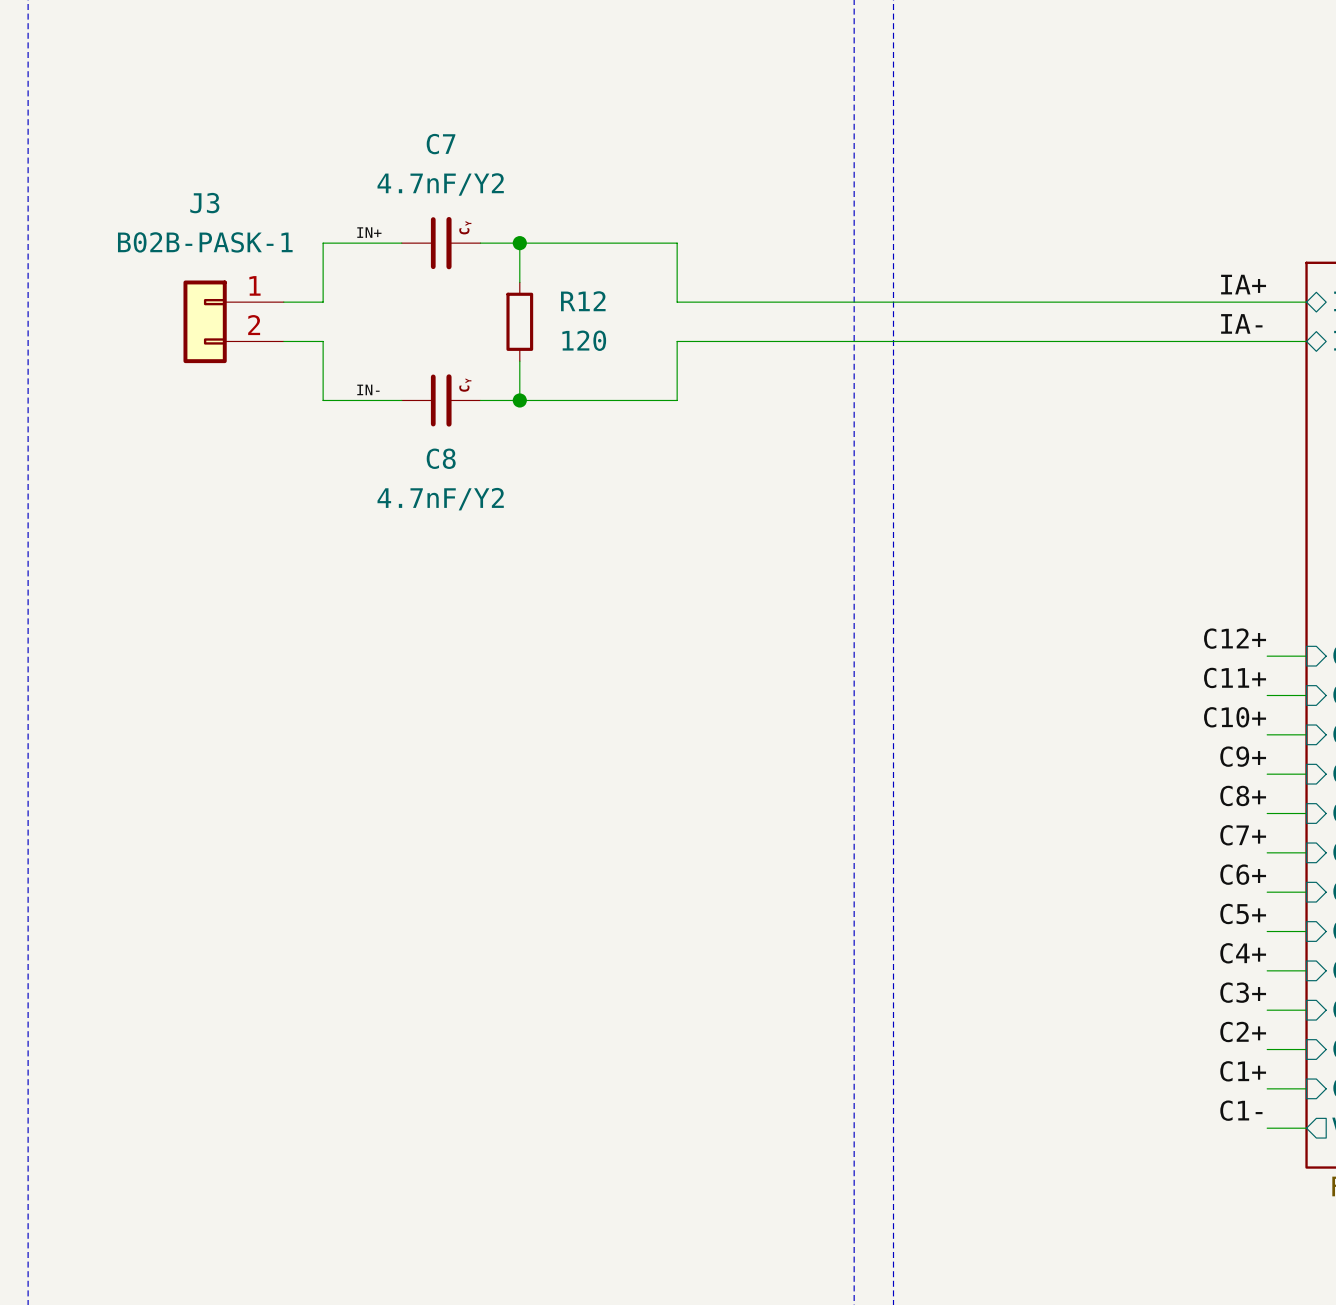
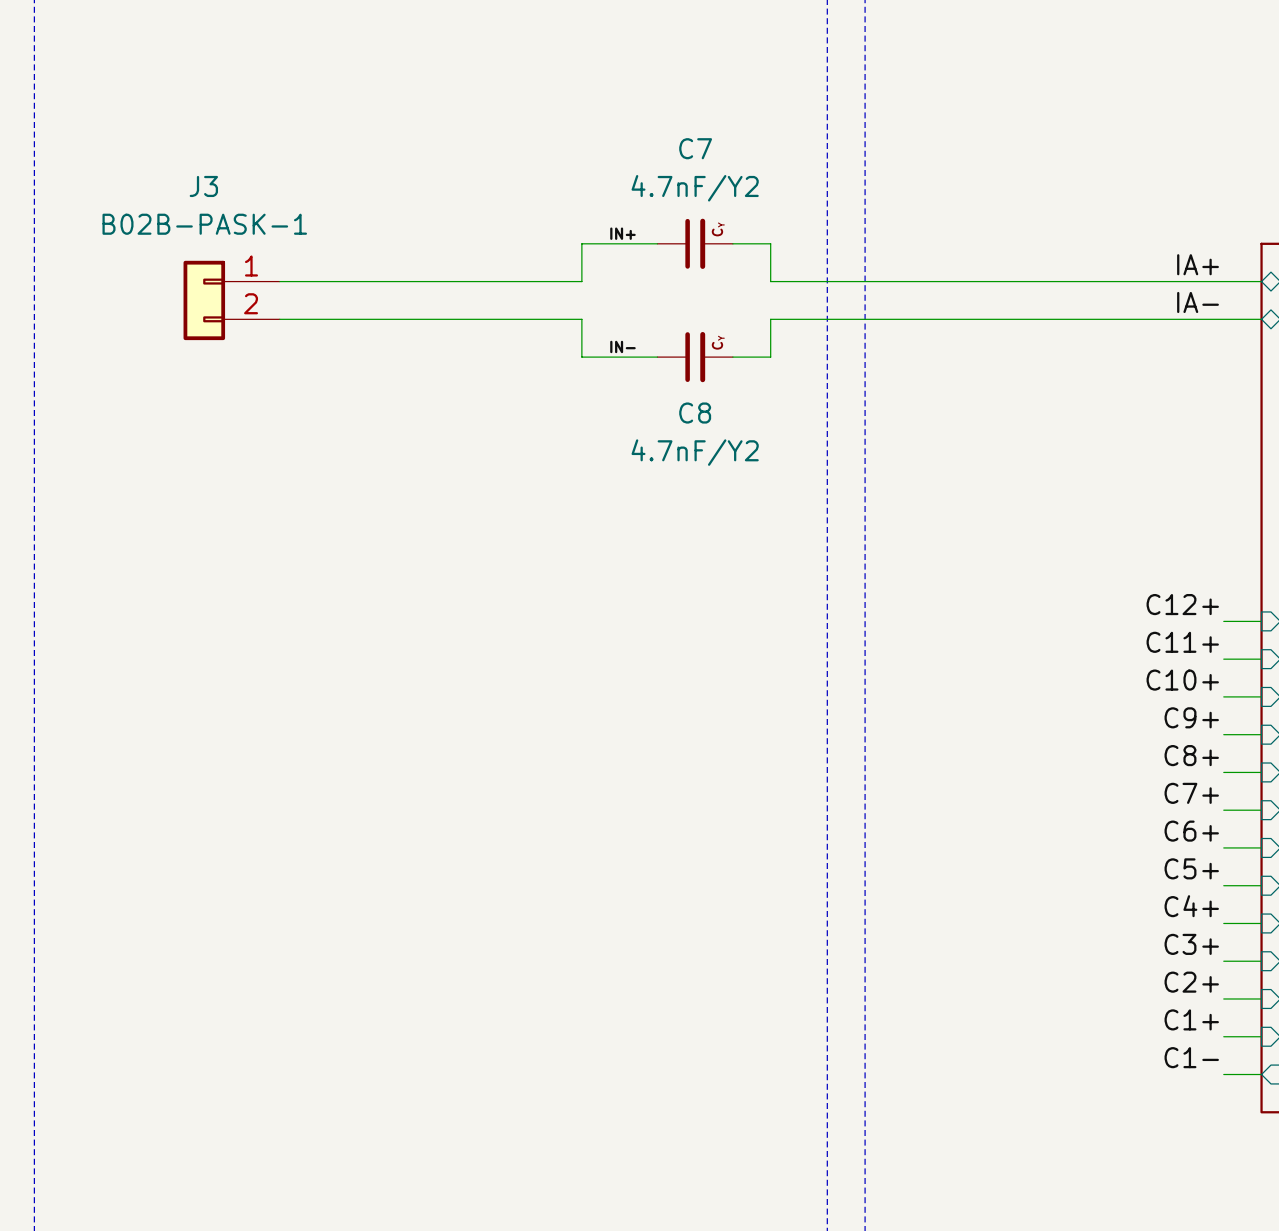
label position: IN+ (369, 232) -> IN+ (622, 233)
wire: (401, 243) (323, 243) (323, 302) -> (657, 243) (581, 243) (581, 281) (317, 281)
C7 position: (441, 243) -> (695, 243)
wire: (480, 243) (677, 243) (677, 302) (795, 302) -> (732, 243) (770, 243) (770, 281)
wire: (519, 243) (519, 282) -> none
junction: (519, 243) -> none
R12: 120 (519, 321) -> none
wire: (323, 341) (323, 400) (401, 400) -> (317, 319) (581, 319) (581, 357) (657, 357)
wire: (795, 341) (677, 341) (677, 400) (480, 400) -> (770, 319) (770, 357) (732, 357)
wire: (519, 361) (519, 400) -> none
label position: IN- (368, 389) -> IN- (622, 346)
C8 position: (441, 400) -> (695, 357)
junction: (519, 400) -> none

